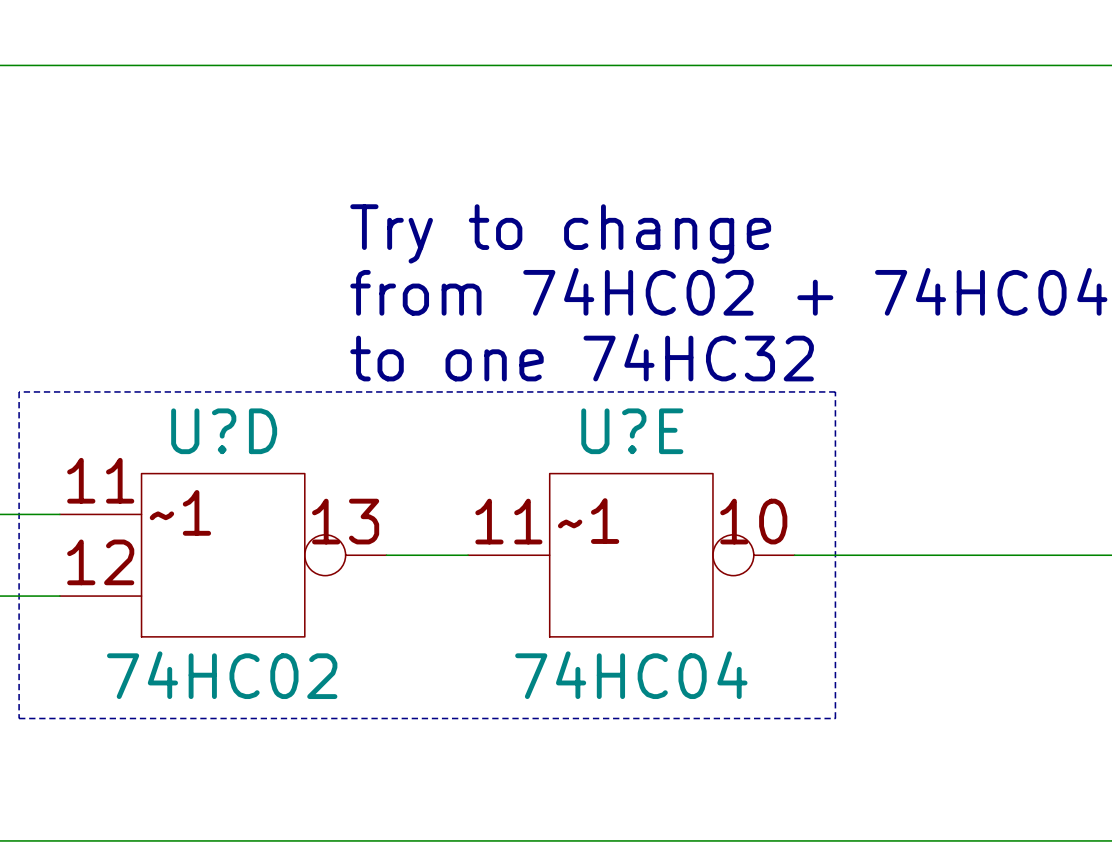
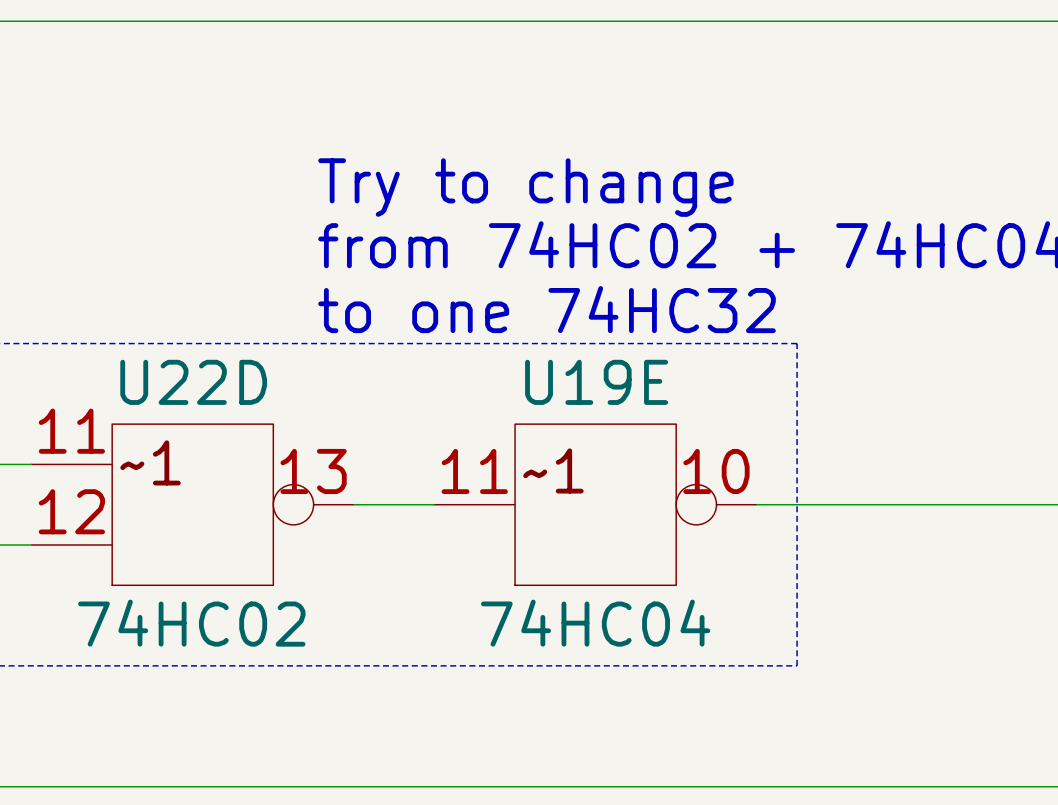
U?D name: U?D (224, 431) -> U22D (193, 382)
U?E name: U?E (632, 431) -> U19E (596, 382)

